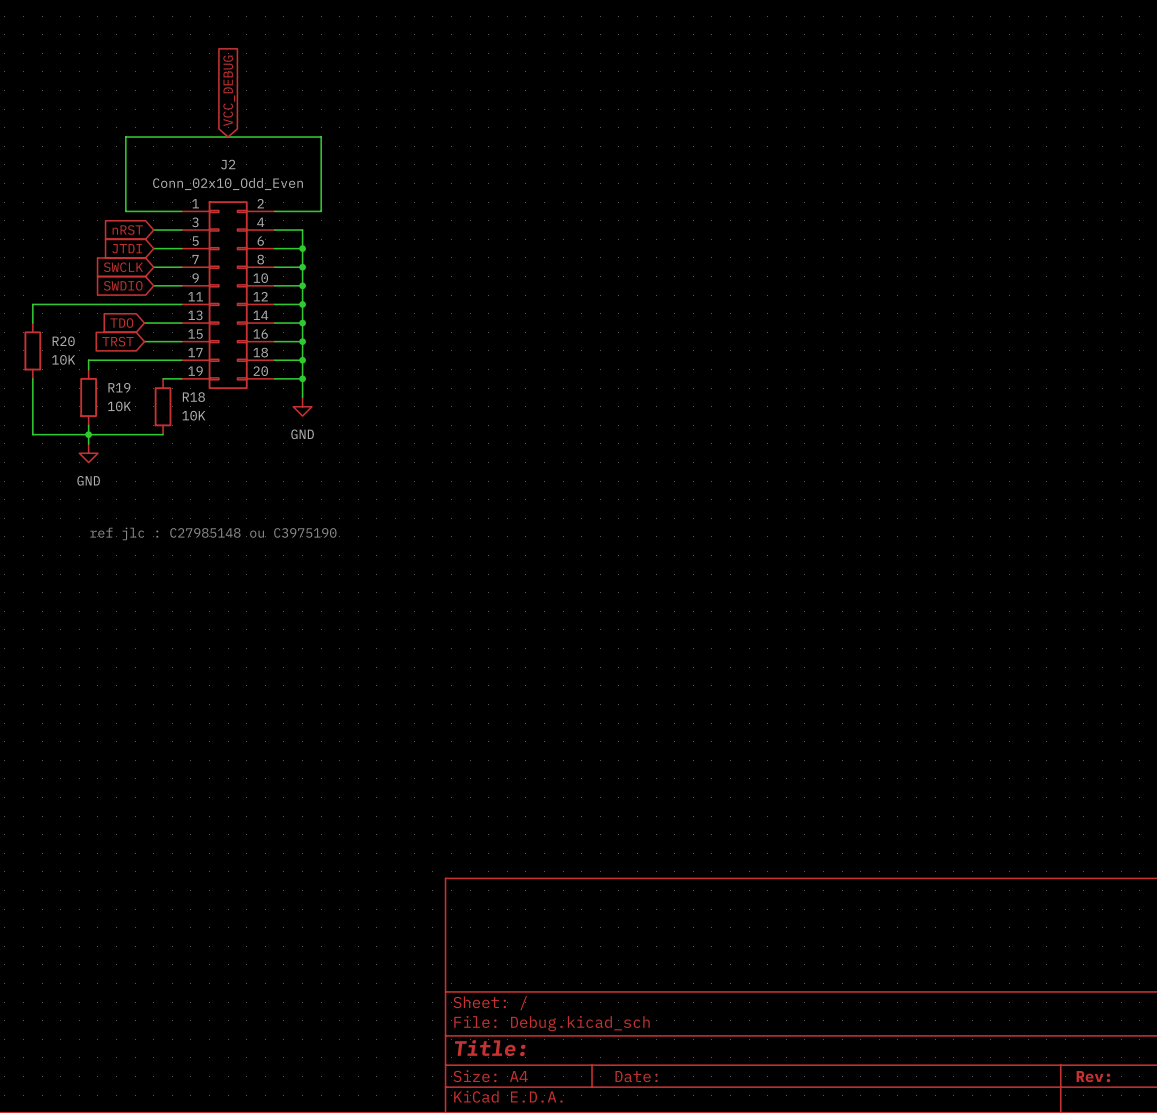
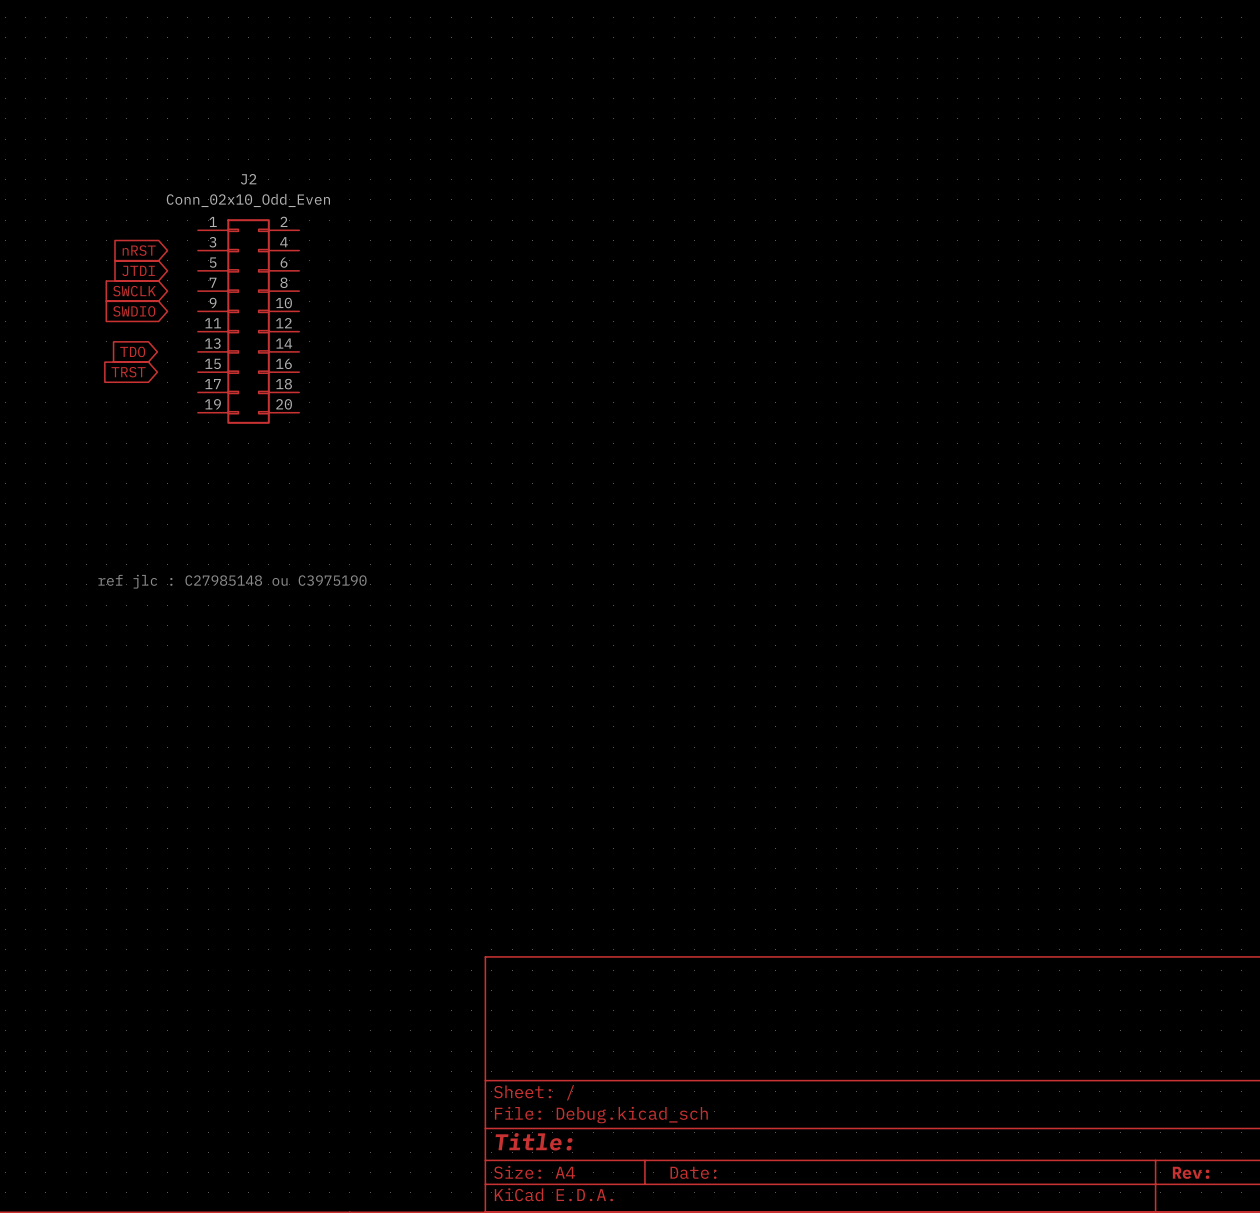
global label: VCC_DEBUG (229, 90) -> none
wire: (181, 211) (125, 211) (125, 137) (321, 137) (321, 211) (274, 211) -> none
wire: (153, 230) (181, 230) -> none
wire: (274, 230) (302, 230) (302, 397) -> none
wire: (153, 248) (181, 248) -> none
wire: (274, 248) (302, 248) -> none
junction: (302, 248) -> none
wire: (153, 267) (181, 267) -> none
wire: (274, 267) (302, 267) -> none
junction: (302, 267) -> none
wire: (153, 285) (181, 285) -> none
wire: (274, 285) (302, 285) -> none
junction: (302, 285) -> none
wire: (181, 304) (32, 304) (32, 323) -> none
wire: (274, 304) (302, 304) -> none
junction: (302, 304) -> none
wire: (144, 323) (181, 323) -> none
wire: (274, 323) (302, 323) -> none
junction: (302, 323) -> none
wire: (144, 341) (181, 341) -> none
wire: (274, 341) (302, 341) -> none
junction: (302, 341) -> none
R20: 10K (32, 350) -> none
wire: (181, 360) (88, 360) (88, 369) -> none
wire: (274, 360) (302, 360) -> none
junction: (302, 360) -> none
wire: (32, 378) (32, 434) (163, 434) -> none
wire: (163, 378) (181, 378) -> none
wire: (274, 378) (302, 378) -> none
junction: (302, 378) -> none
R19: 10K (88, 397) -> none
R18: 10K (163, 406) -> none
power symbol: GND (302, 406) -> none
wire: (88, 425) (88, 443) -> none
junction: (88, 434) -> none
power symbol: GND (88, 453) -> none

